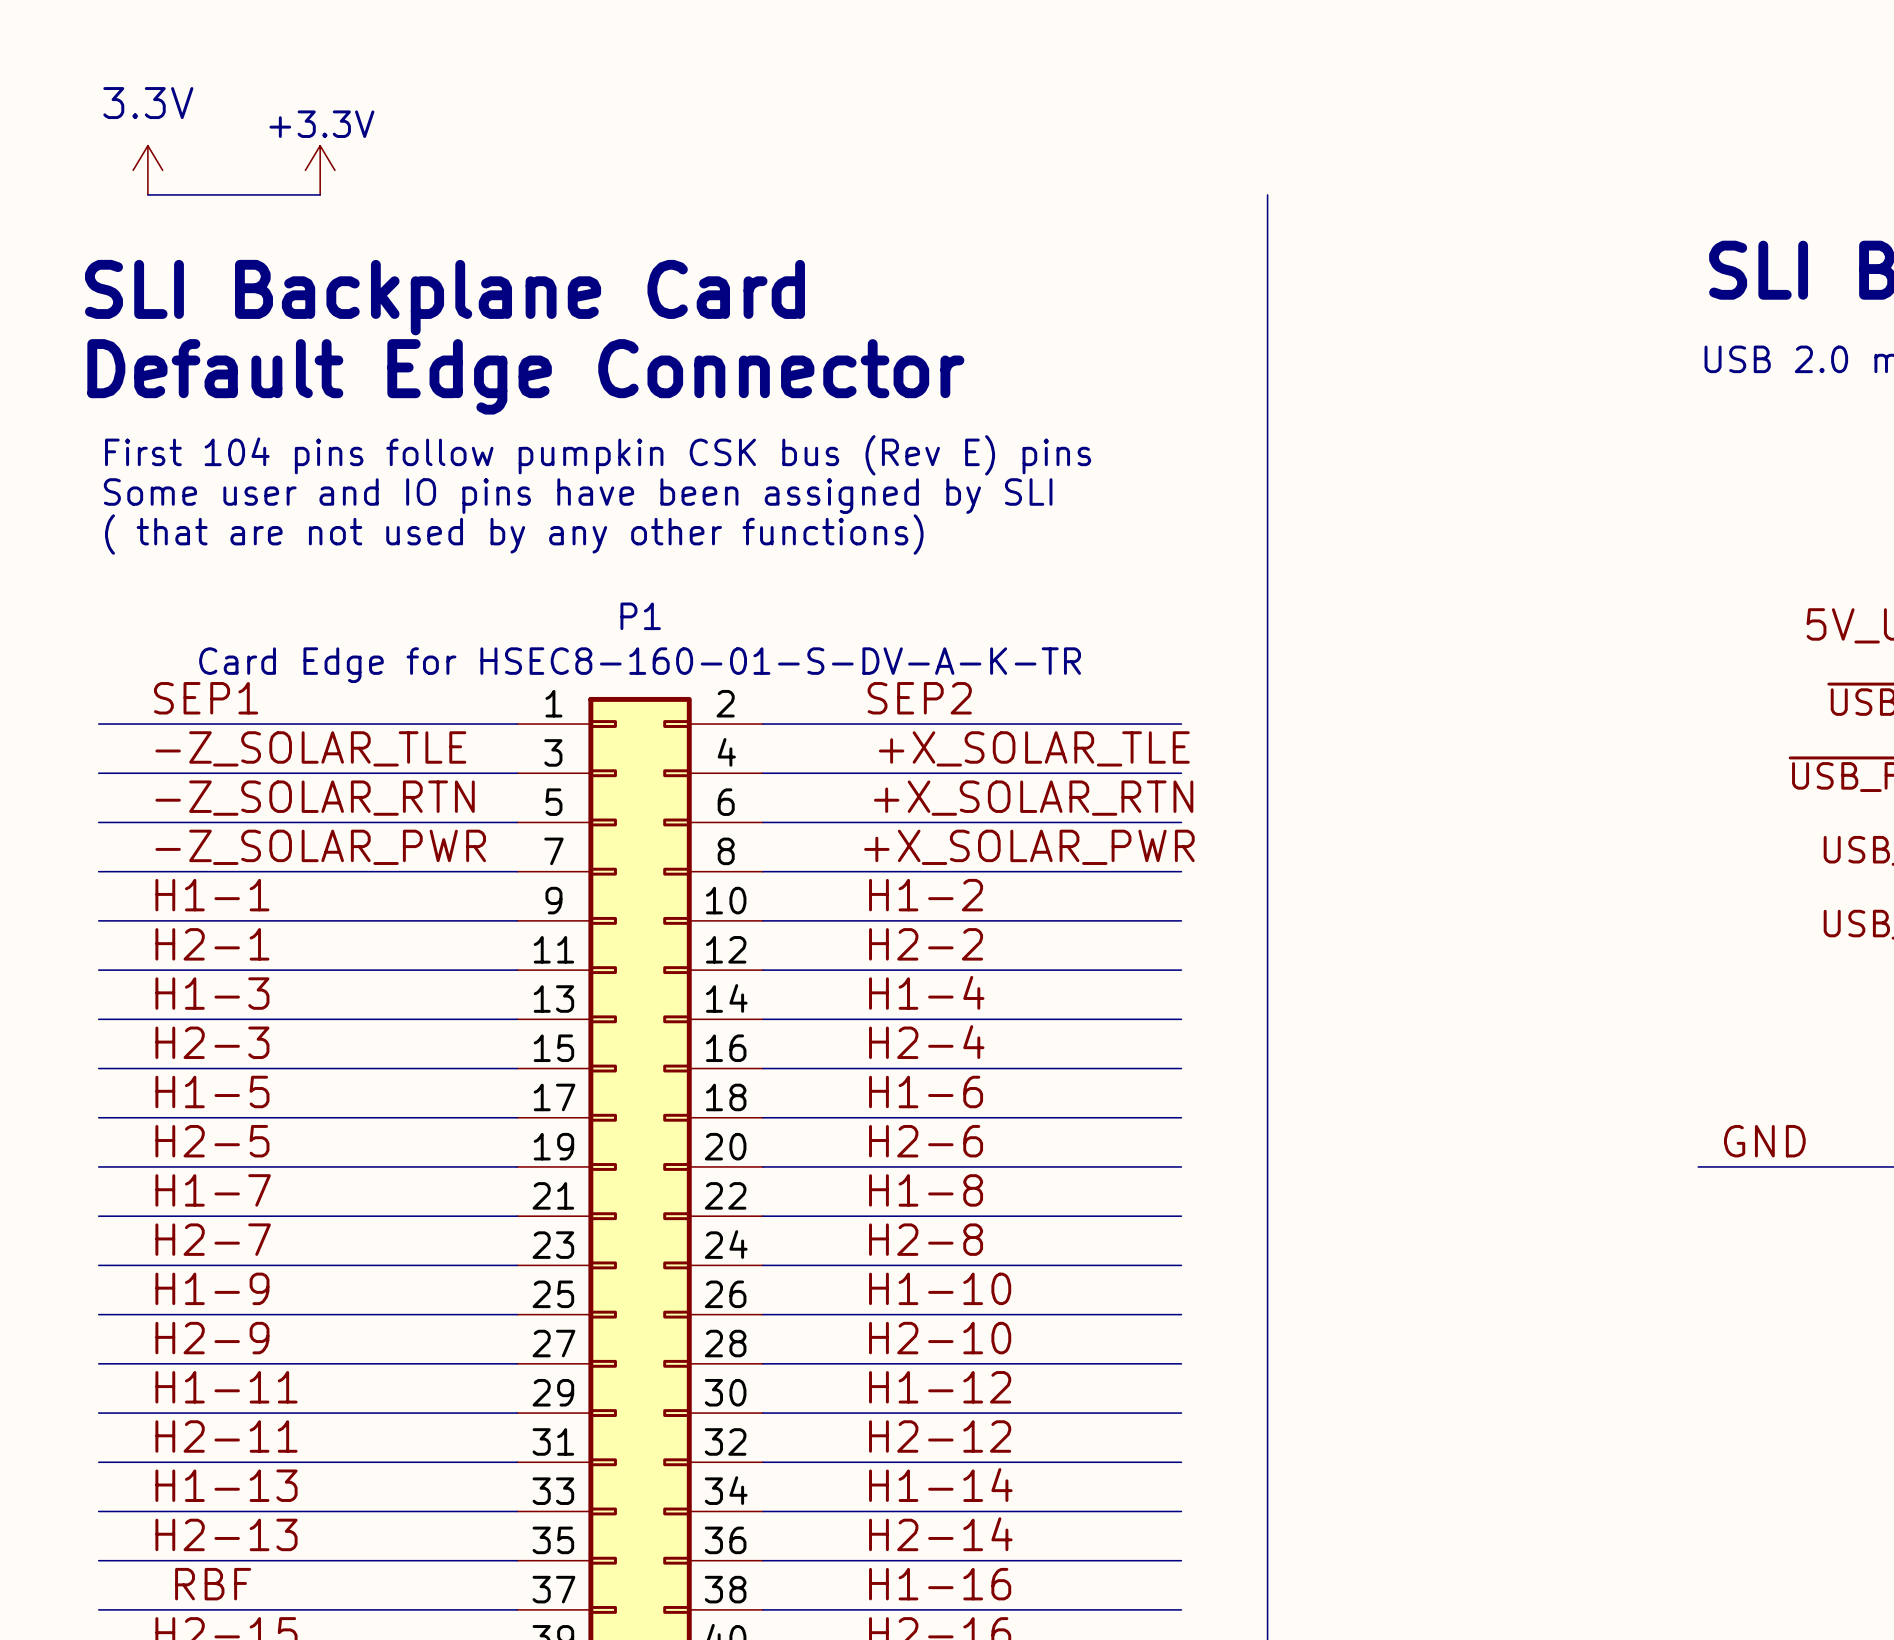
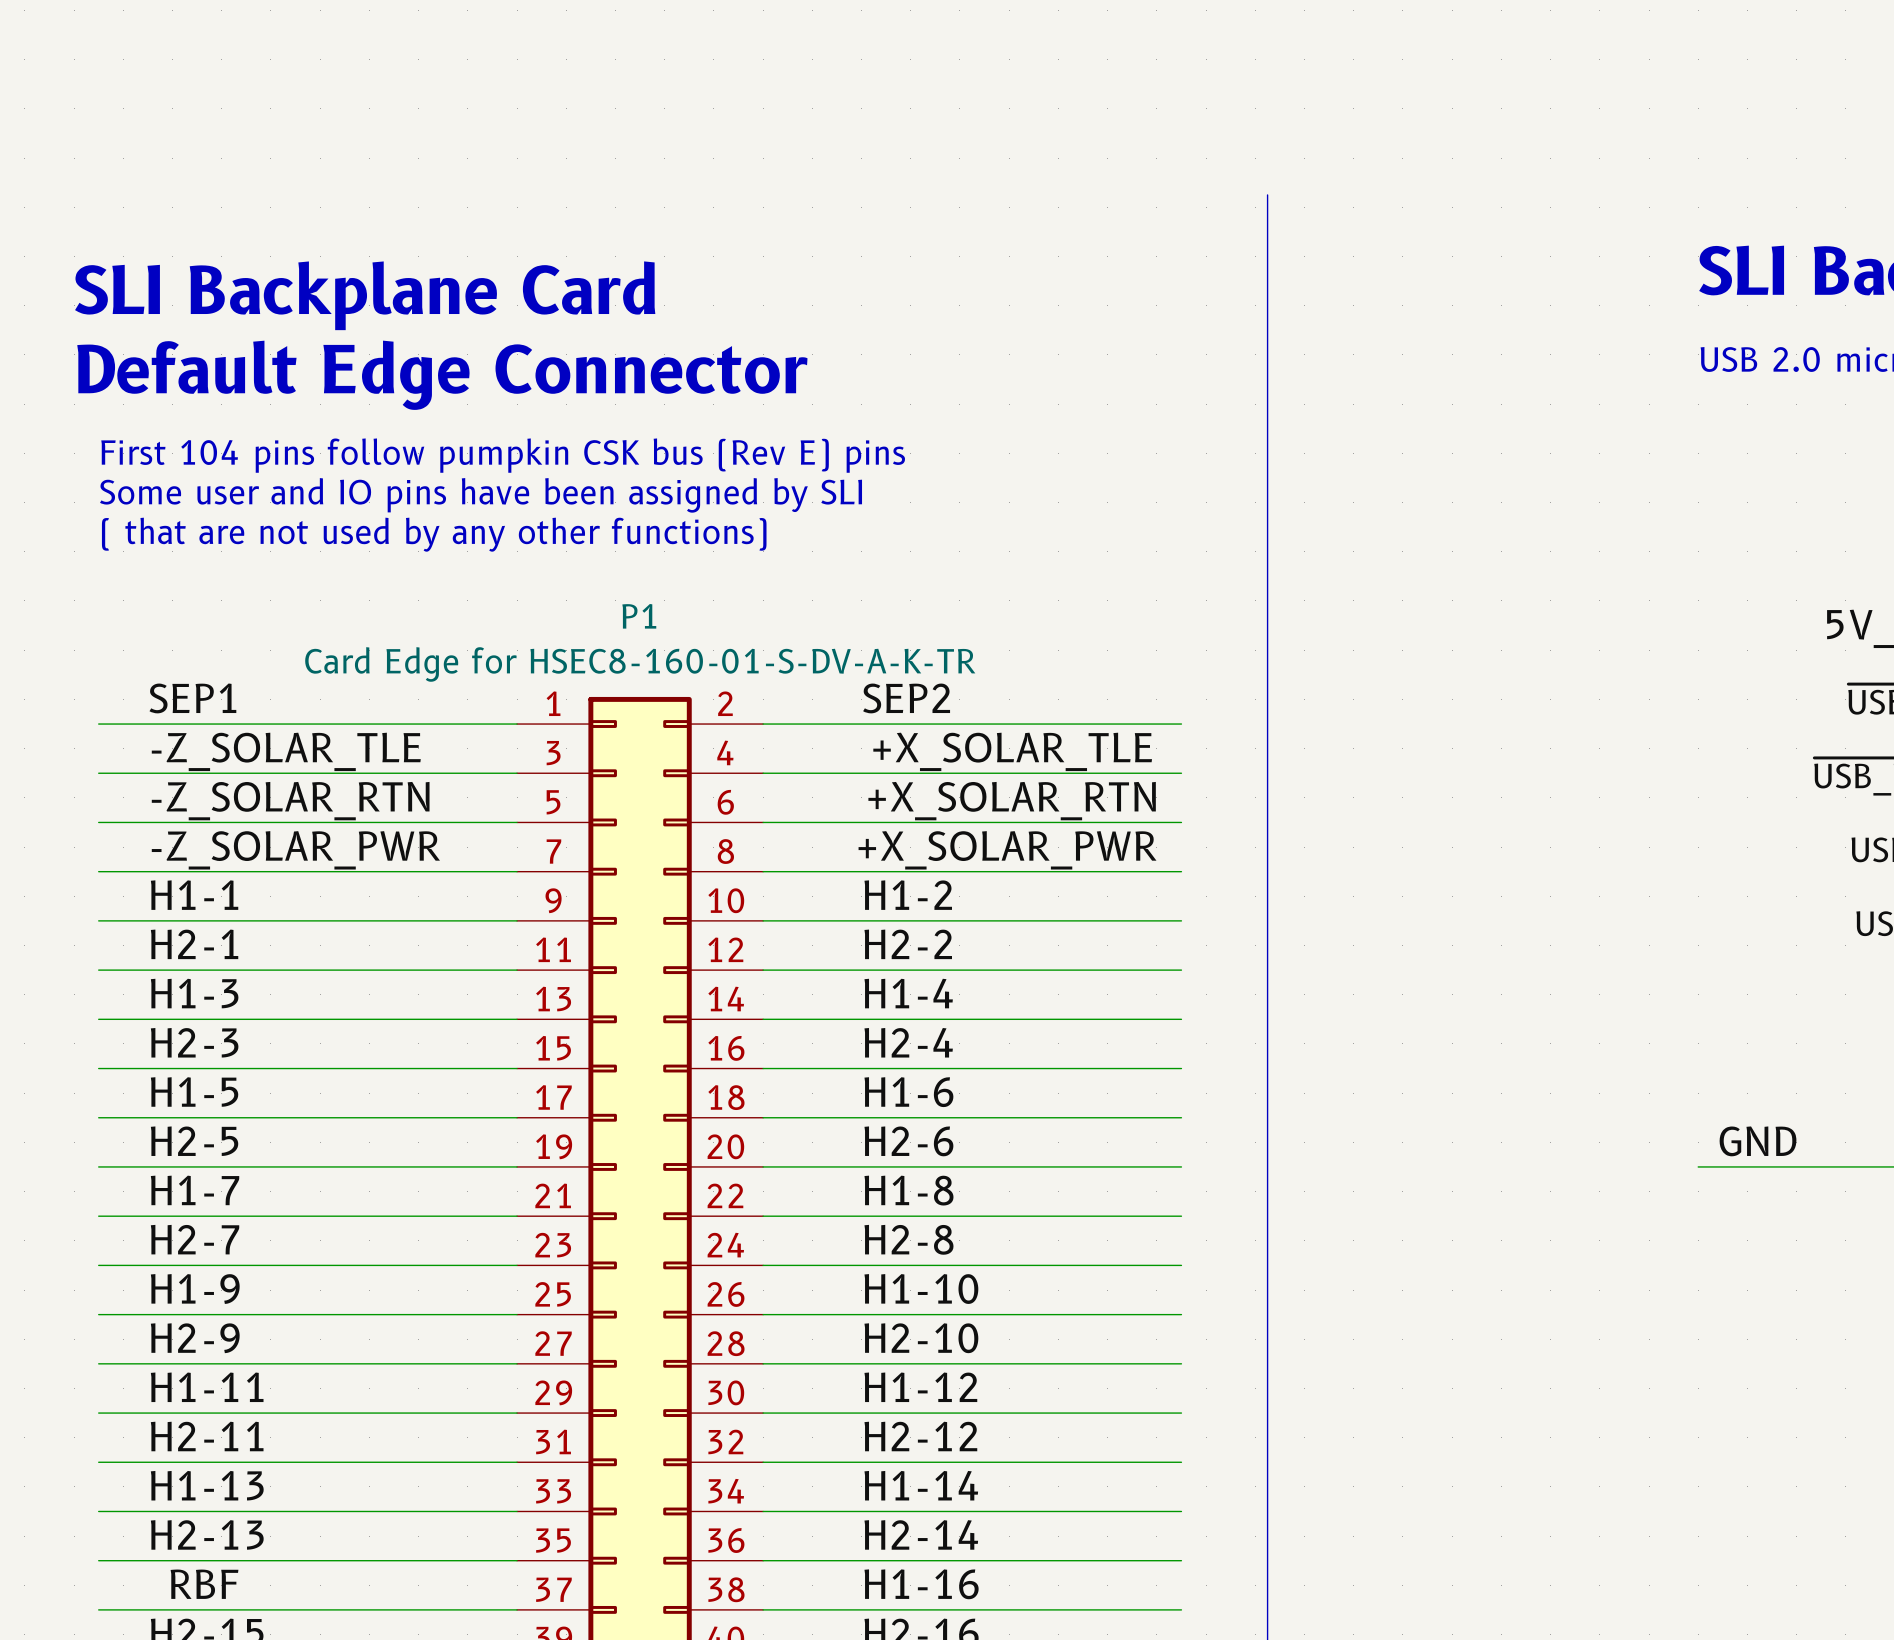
power symbol: 3.3V (147, 170) -> none
power symbol: +3.3V (320, 170) -> none
wire: (147, 194) (320, 194) -> none

